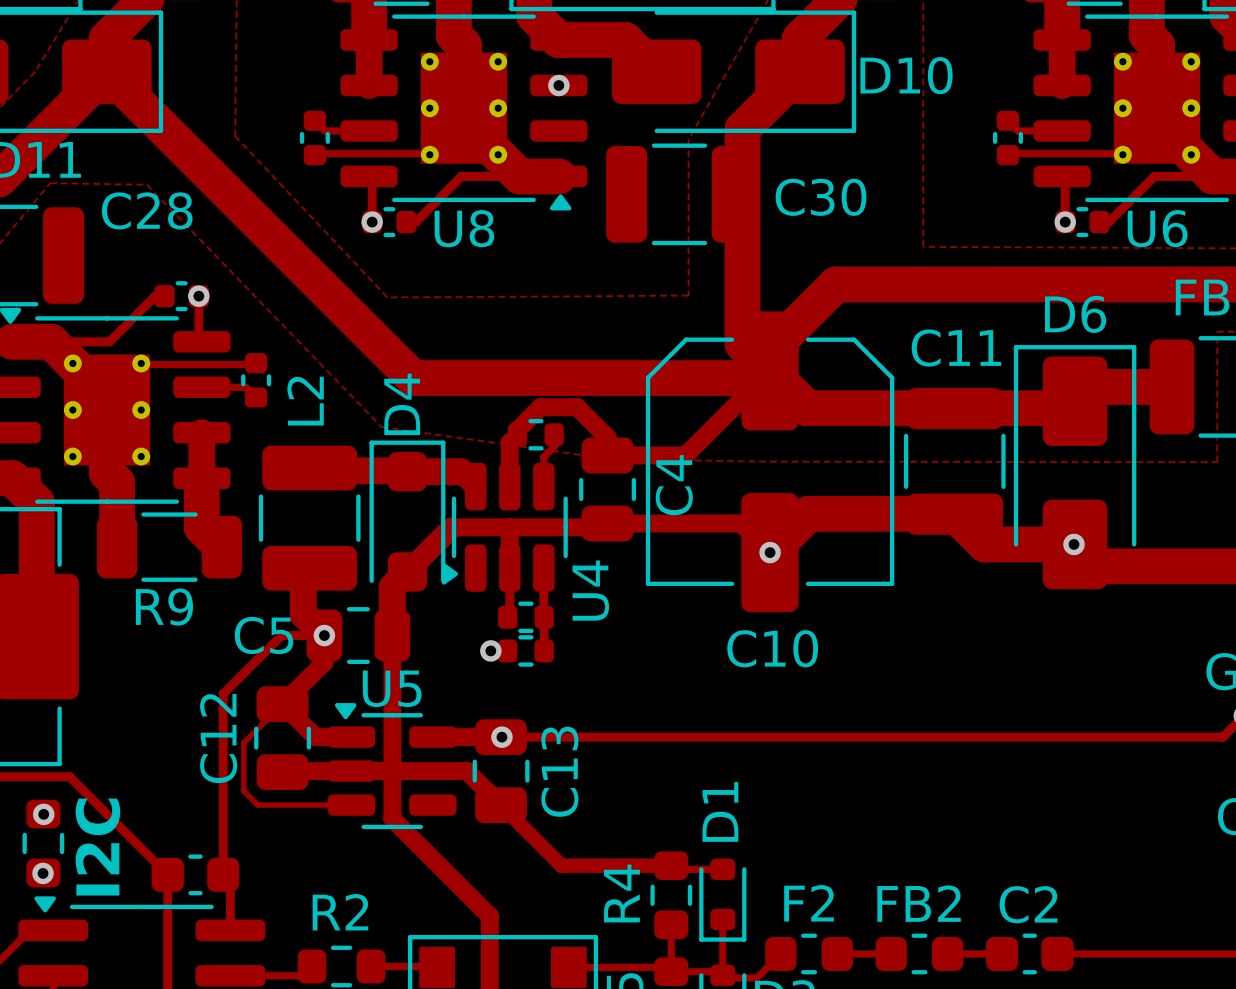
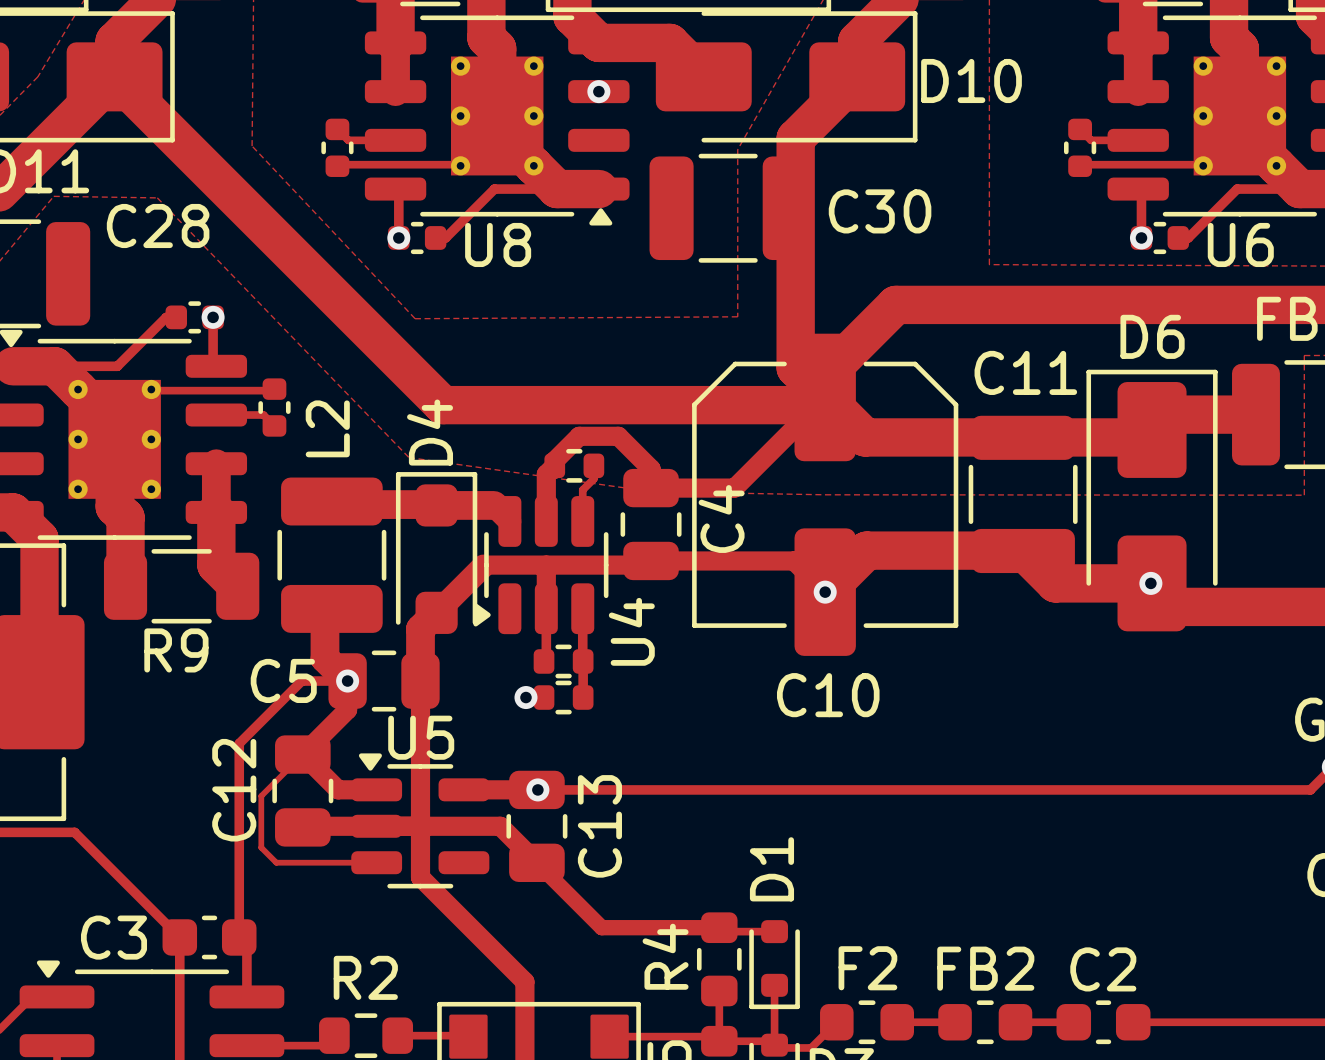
via: (43, 814) -> none
part: (43, 843) -> none
text: I2C (97, 847) -> none
via: (43, 873) -> none
C3 name: none -> C3 (114, 937)

